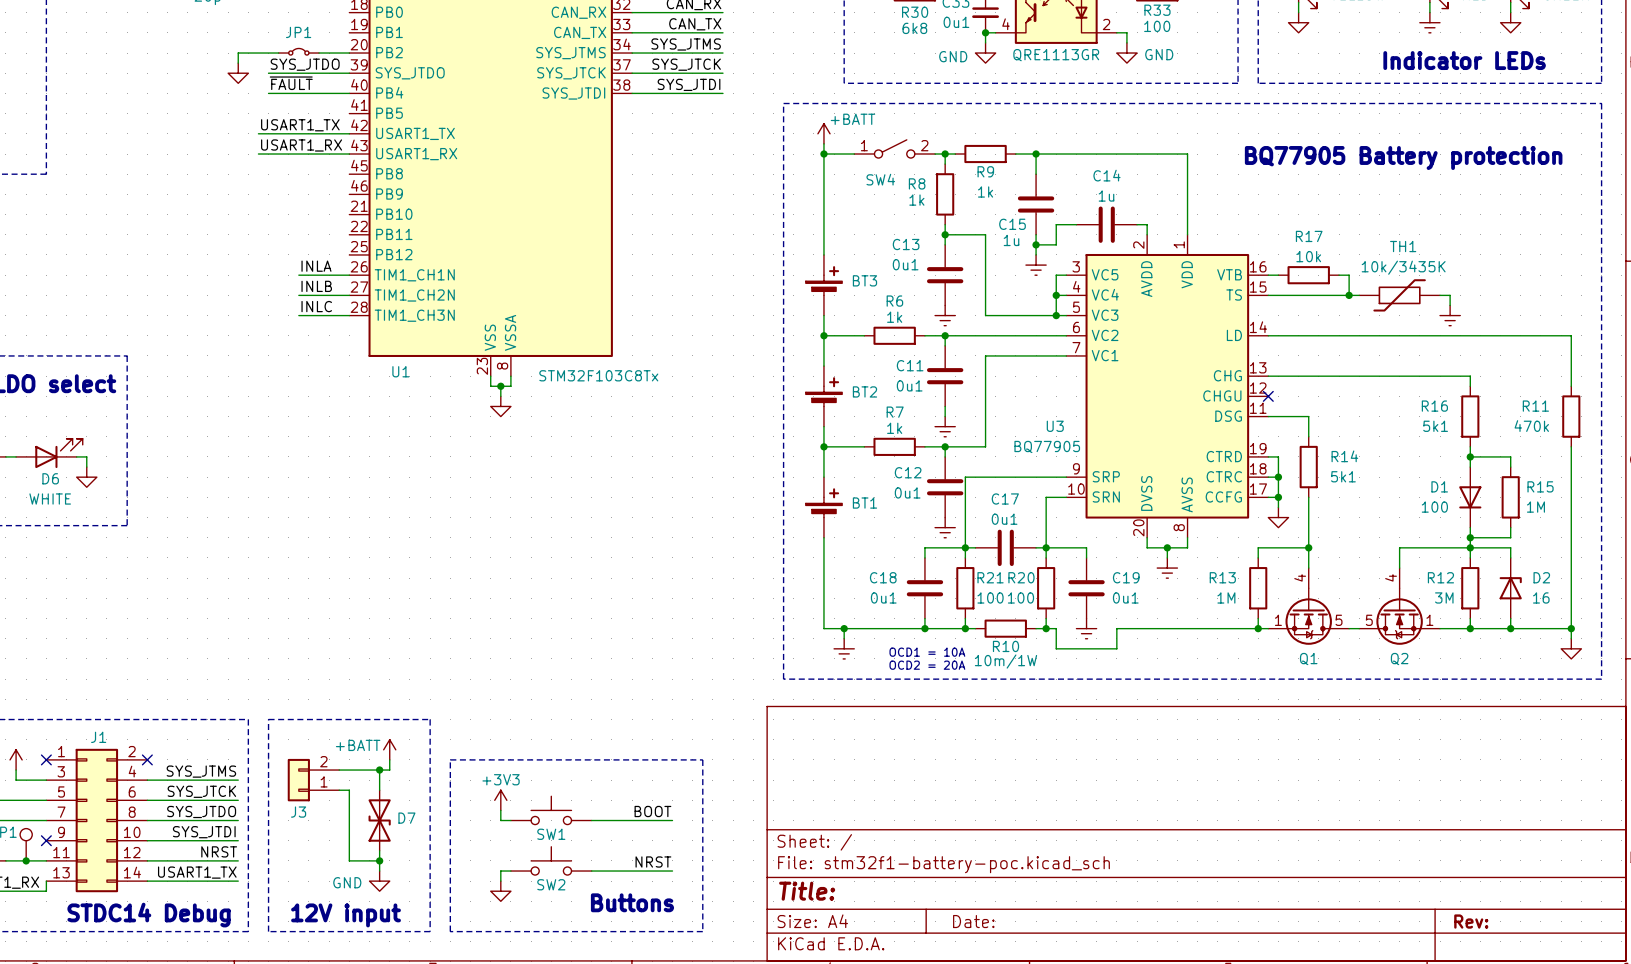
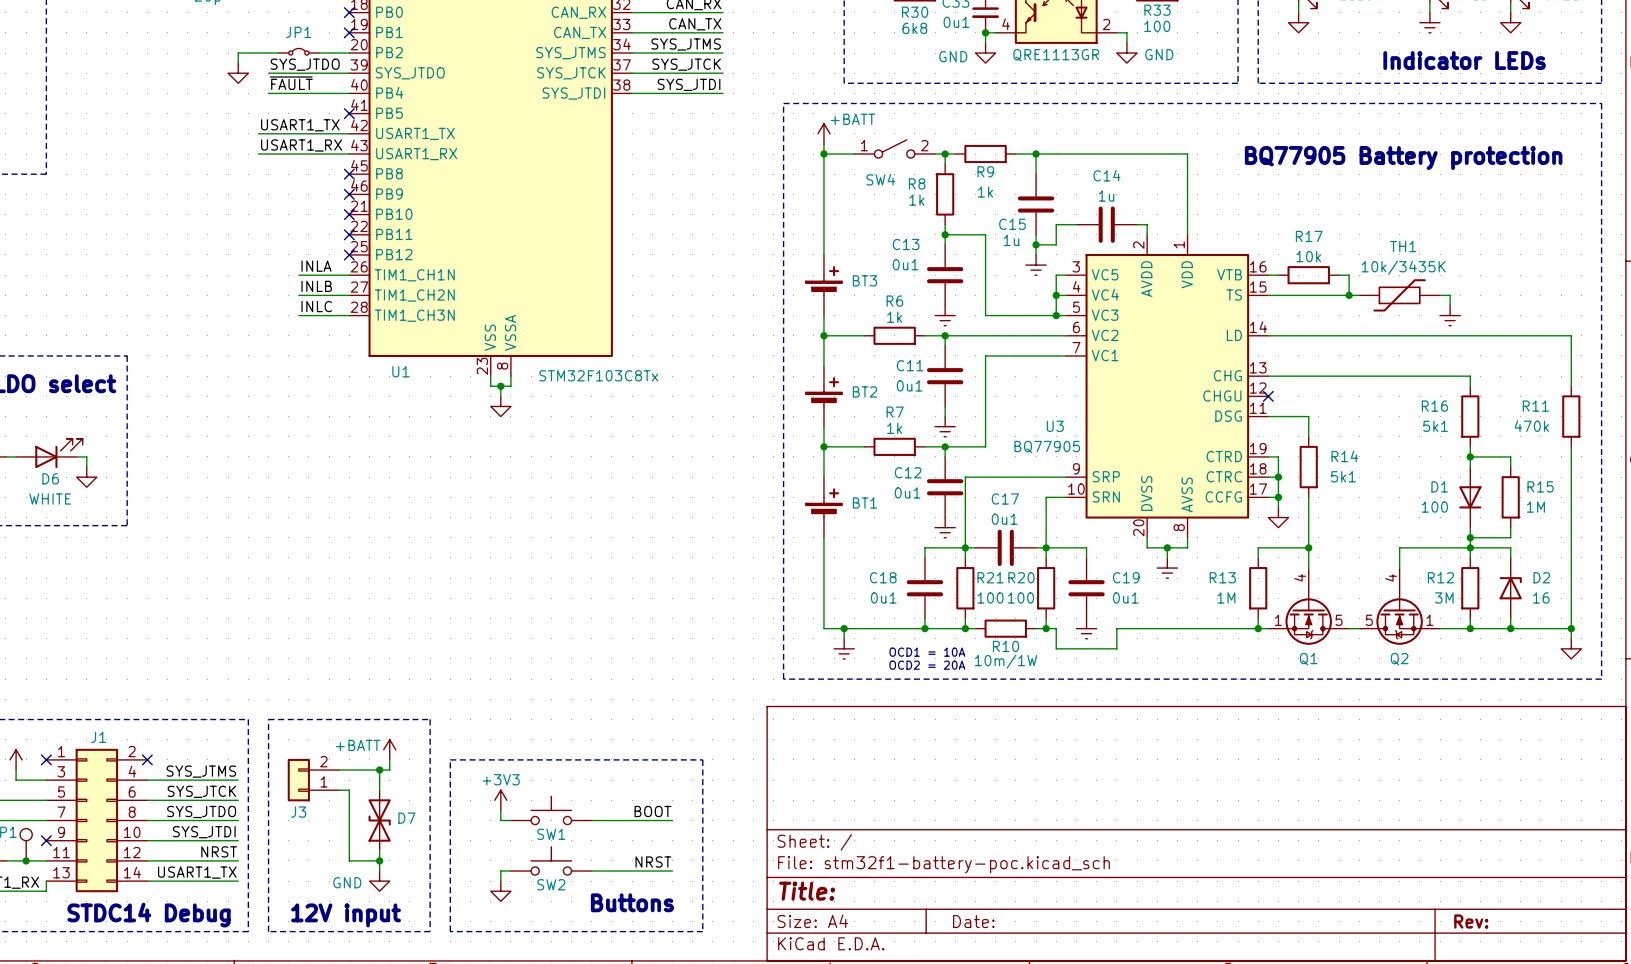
no-connect mark: none -> (349, 12)
no-connect mark: none -> (349, 32)
no-connect mark: none -> (349, 113)
no-connect mark: none -> (349, 174)
no-connect mark: none -> (349, 194)
no-connect mark: none -> (349, 214)
no-connect mark: none -> (349, 234)
no-connect mark: none -> (349, 254)

